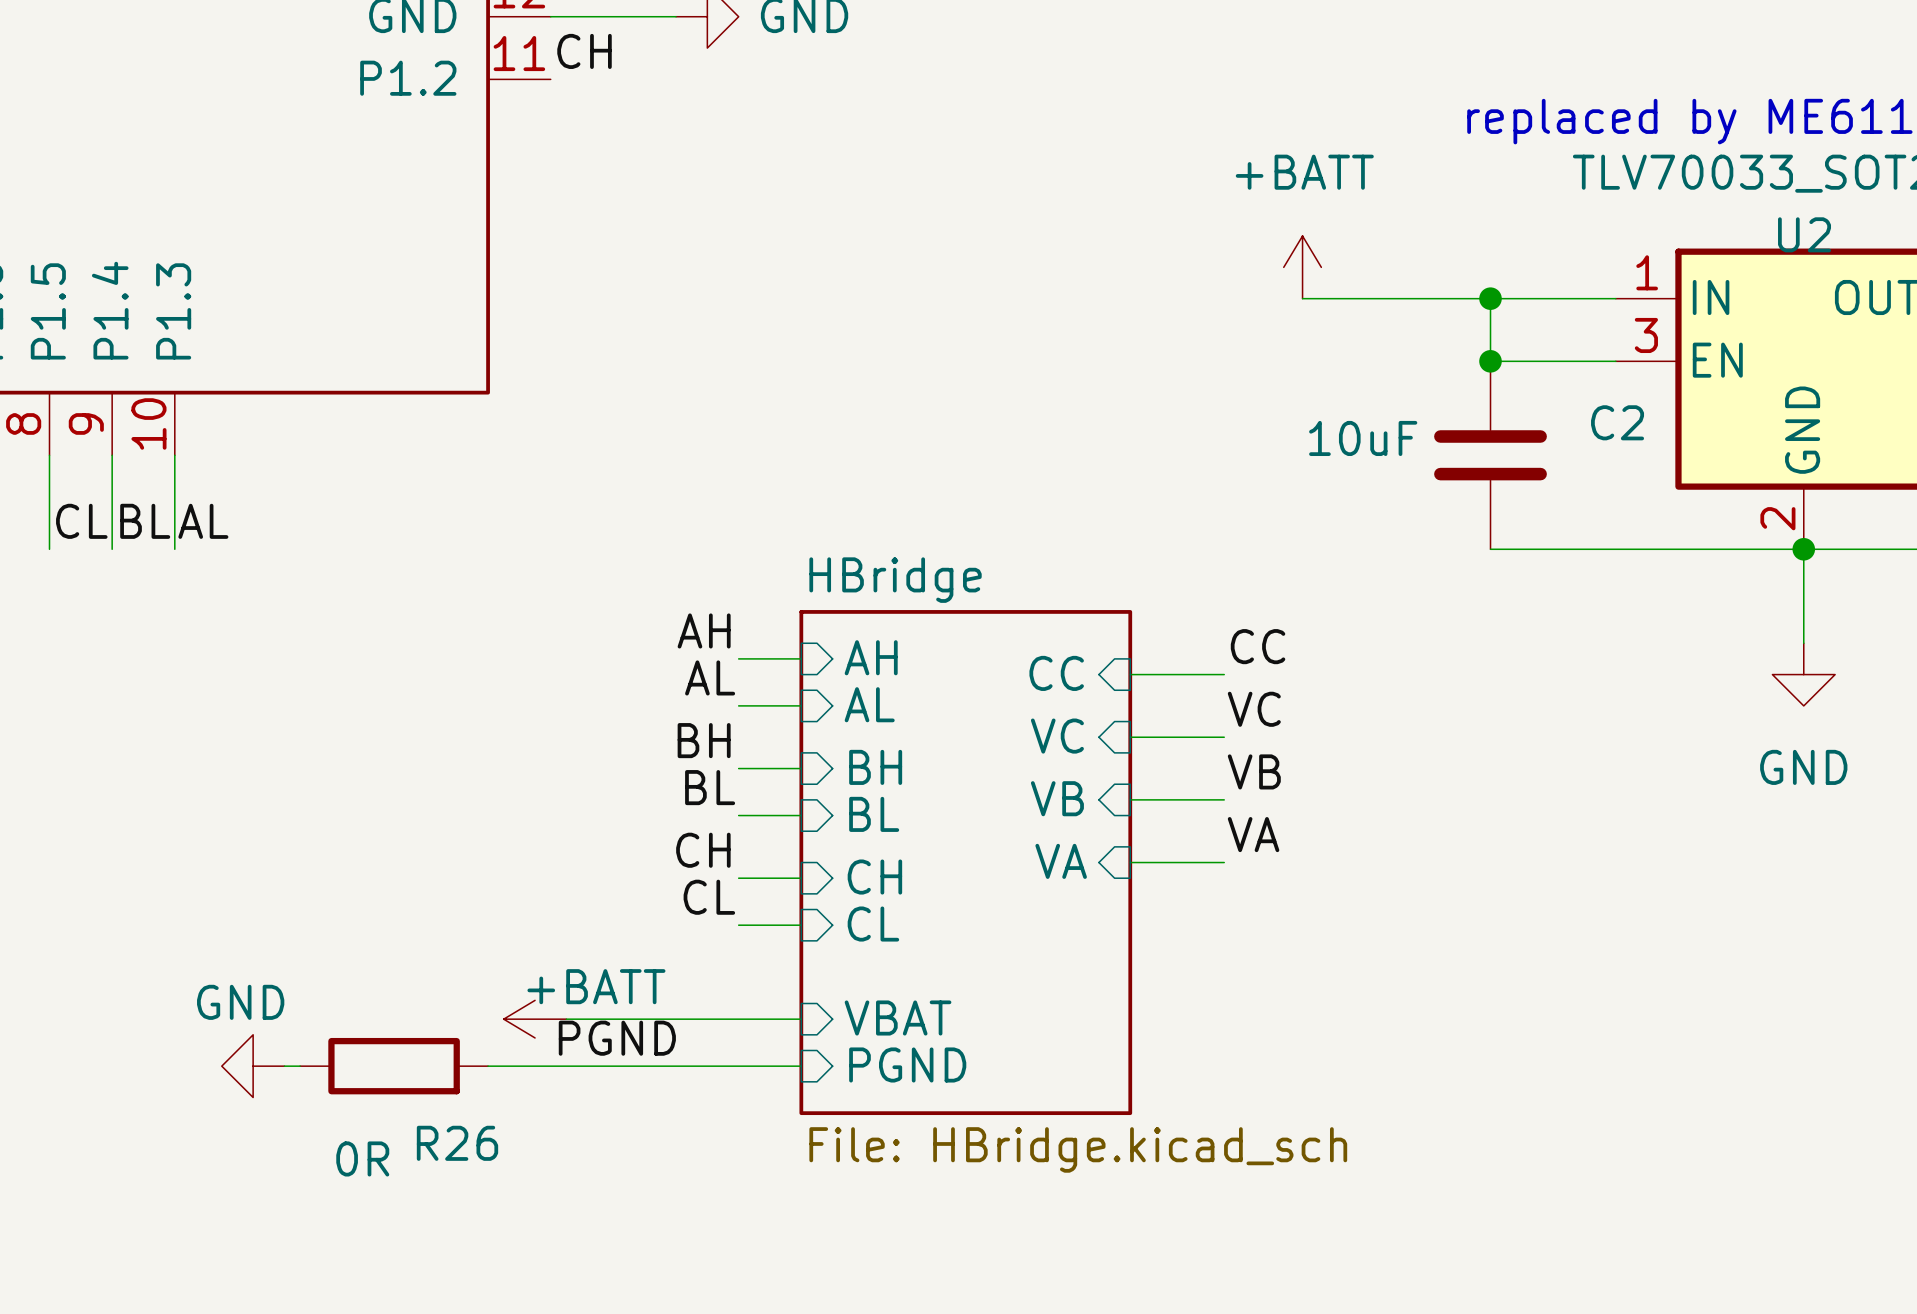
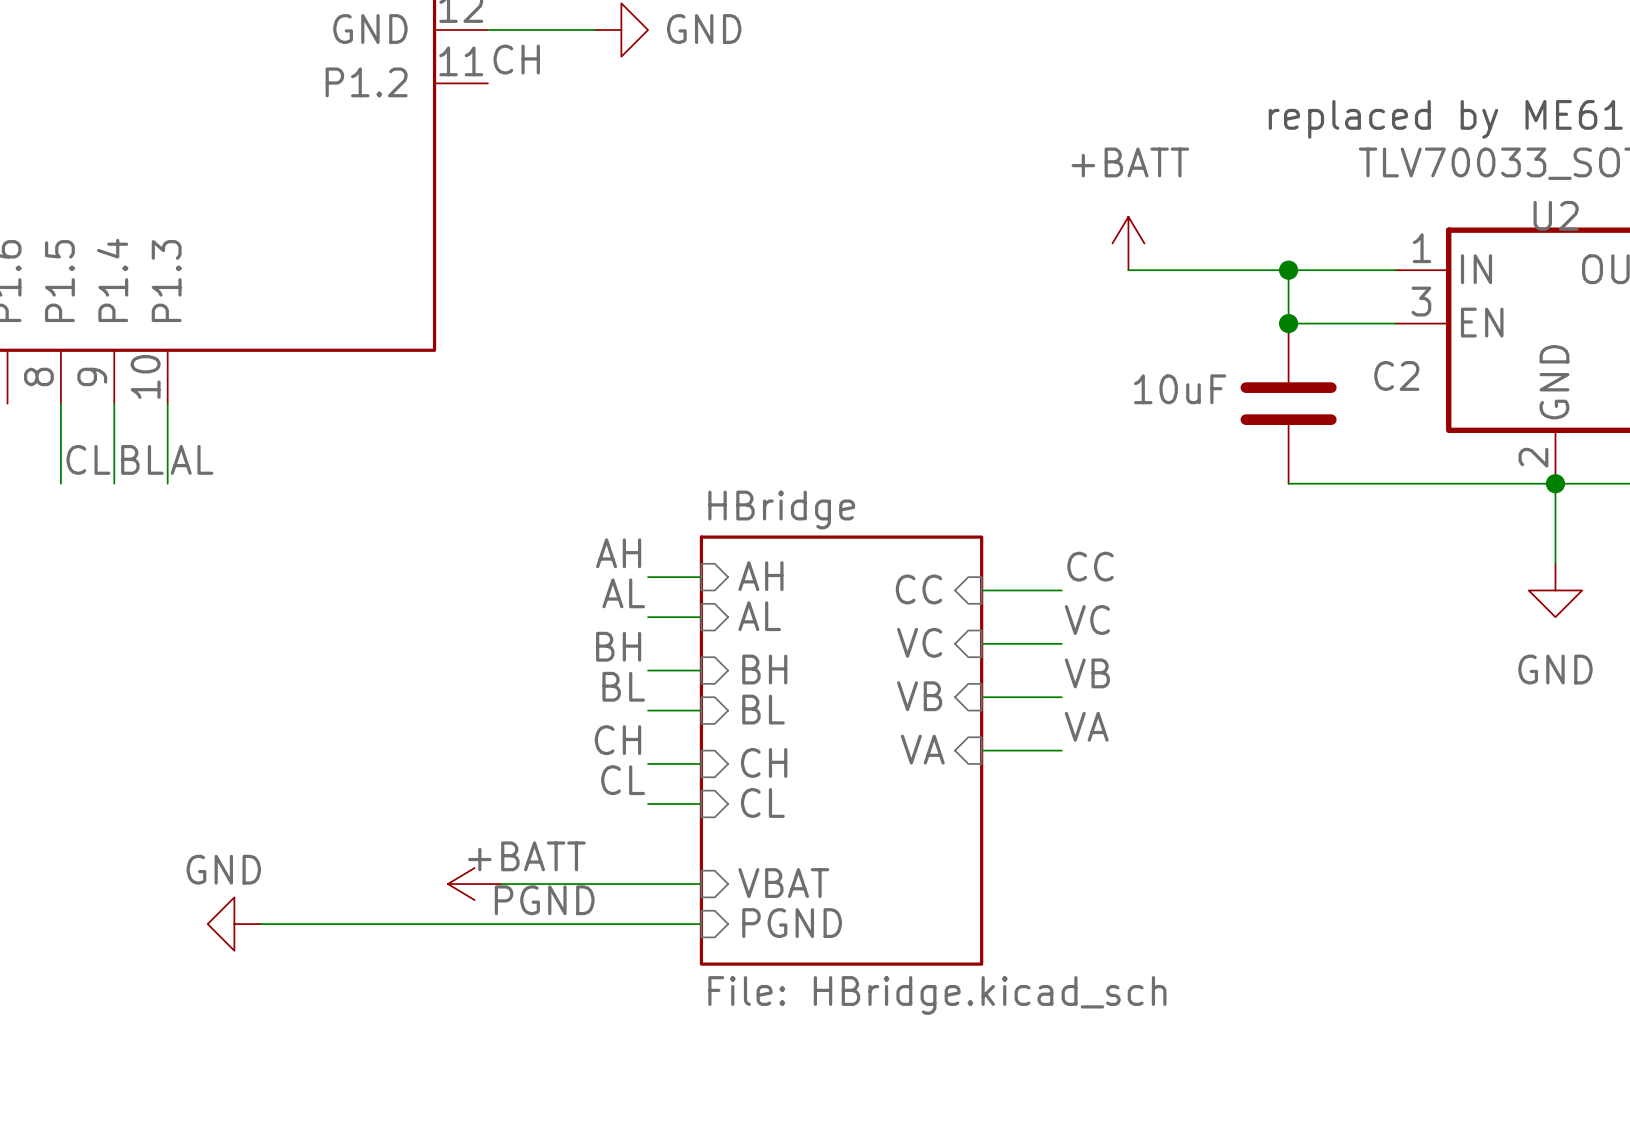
wire: none -> (274, 924) (434, 924)
R26: 0R (394, 1066) -> none

